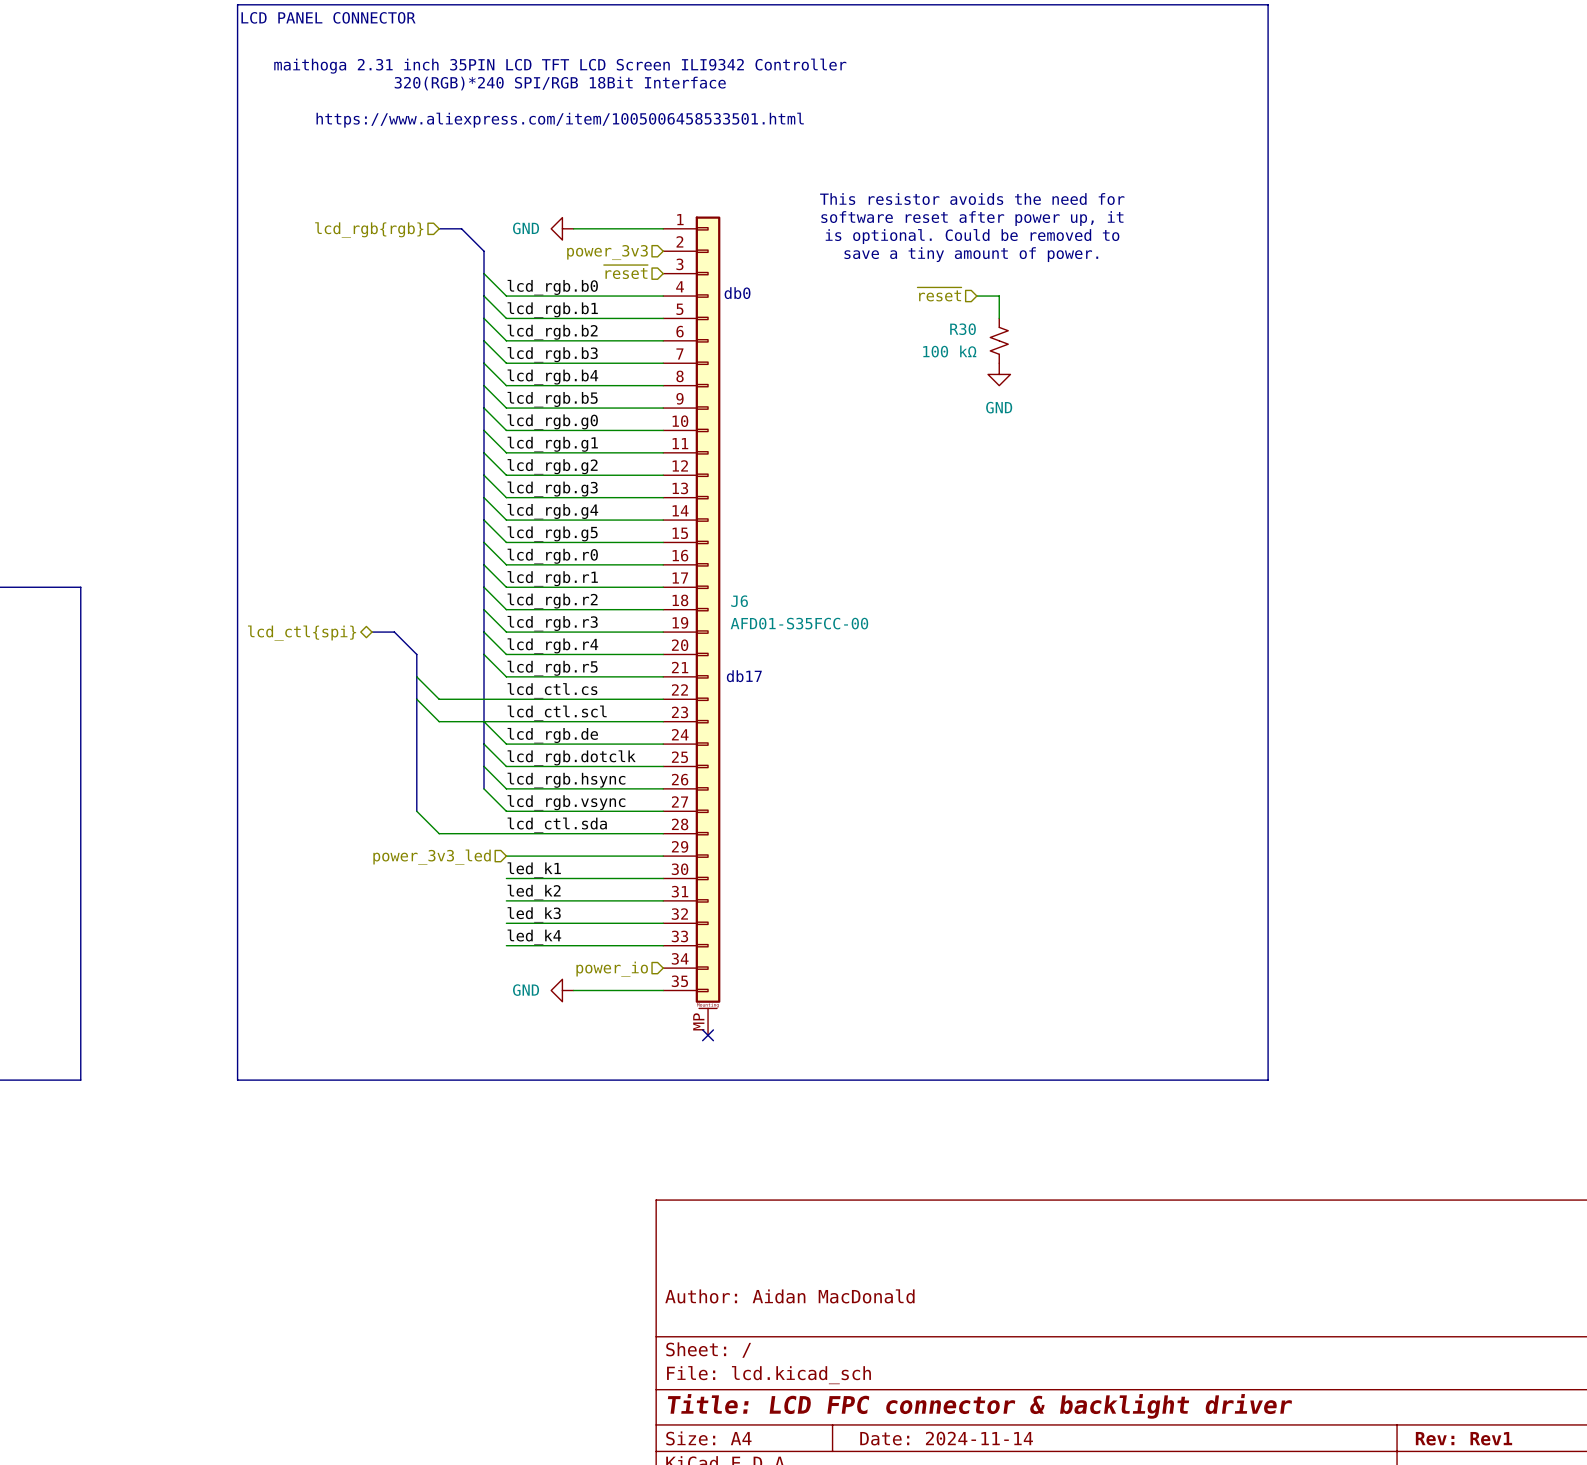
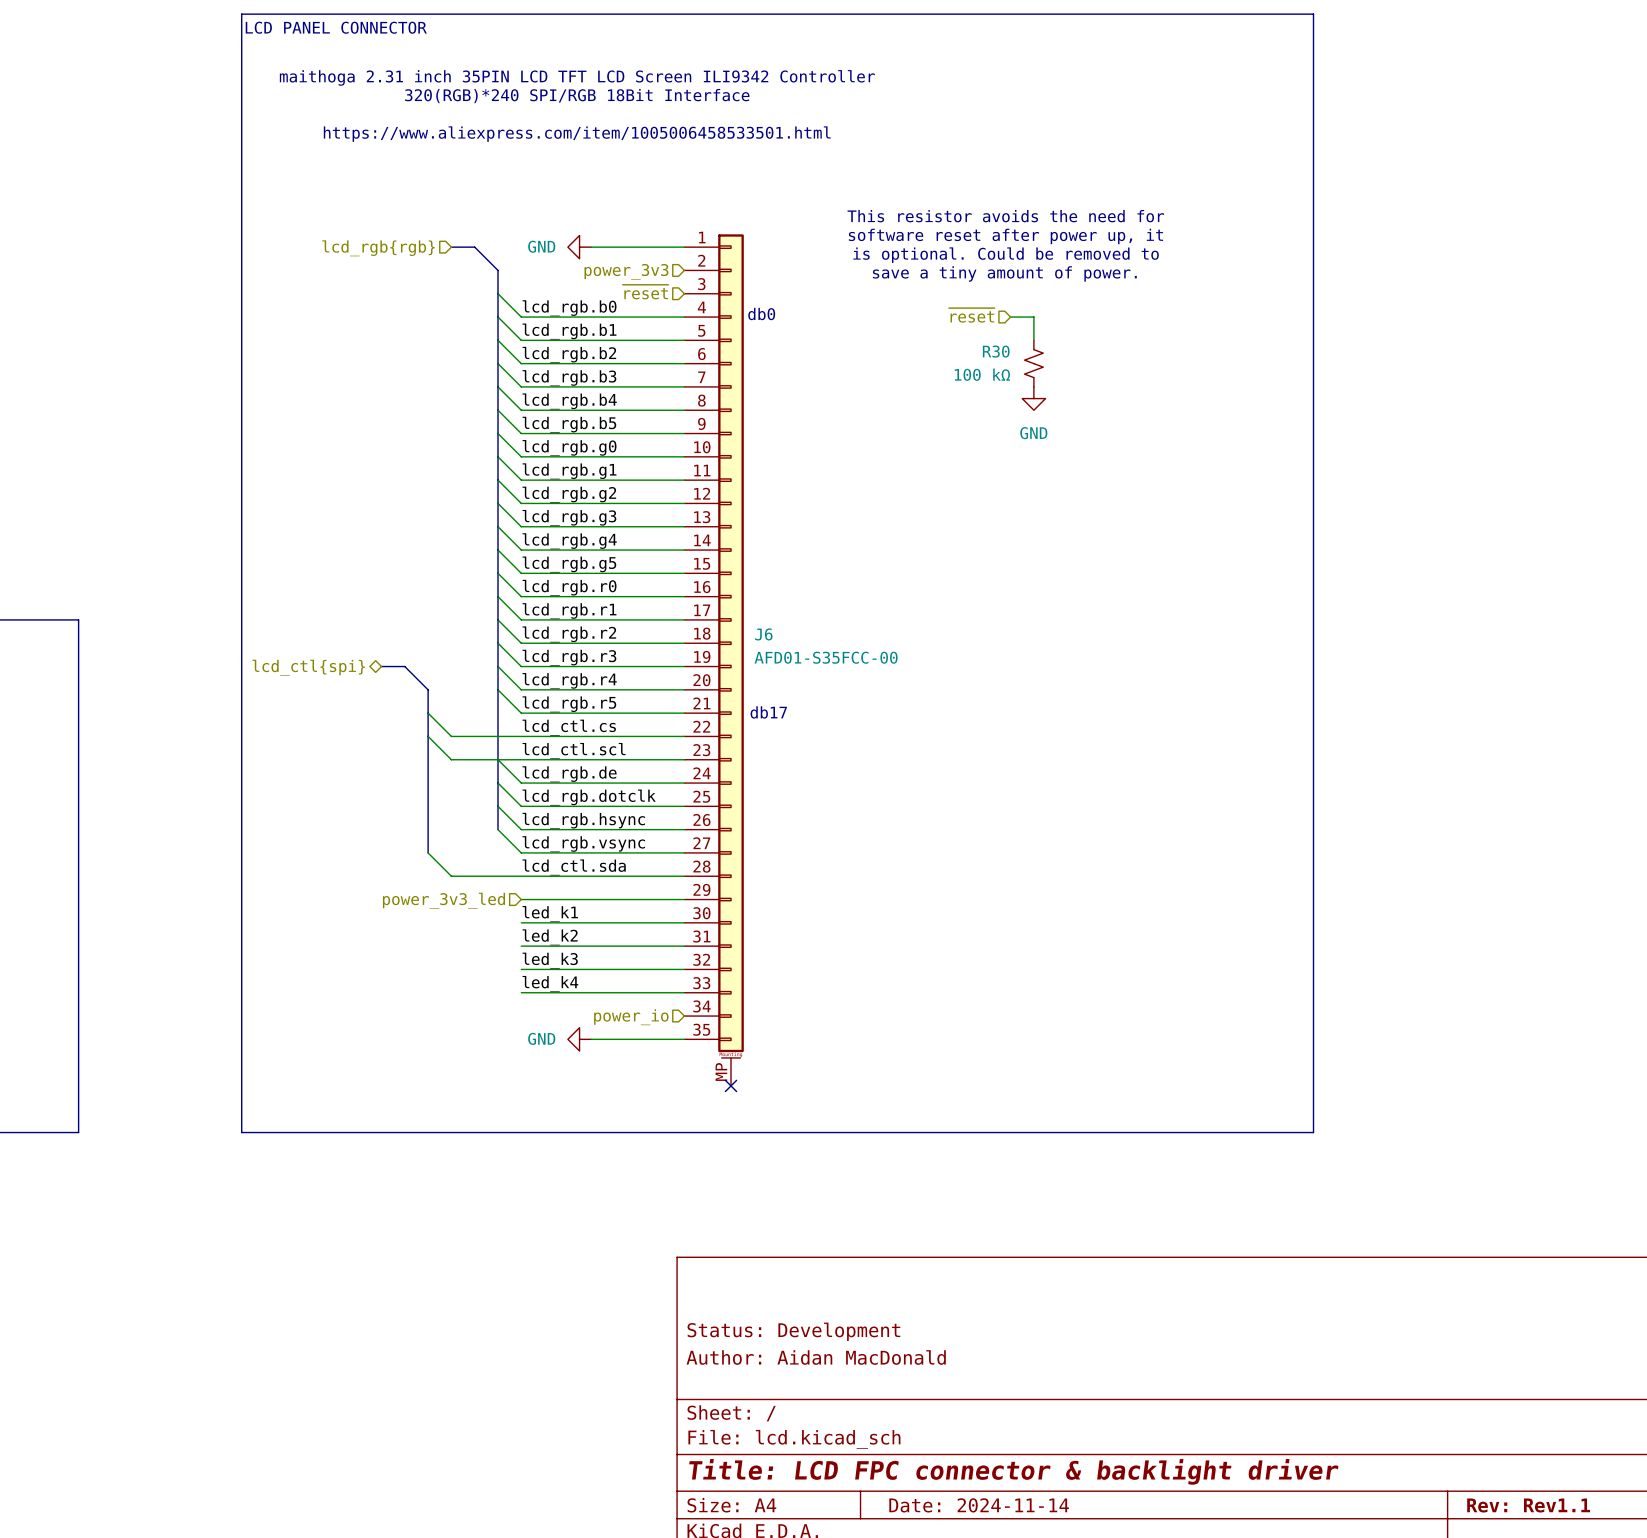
title block: none -> Status: Development (793, 1331)
title block: Rev: Rev1 (1463, 1438) -> Rev: Rev1.1 (1528, 1505)

